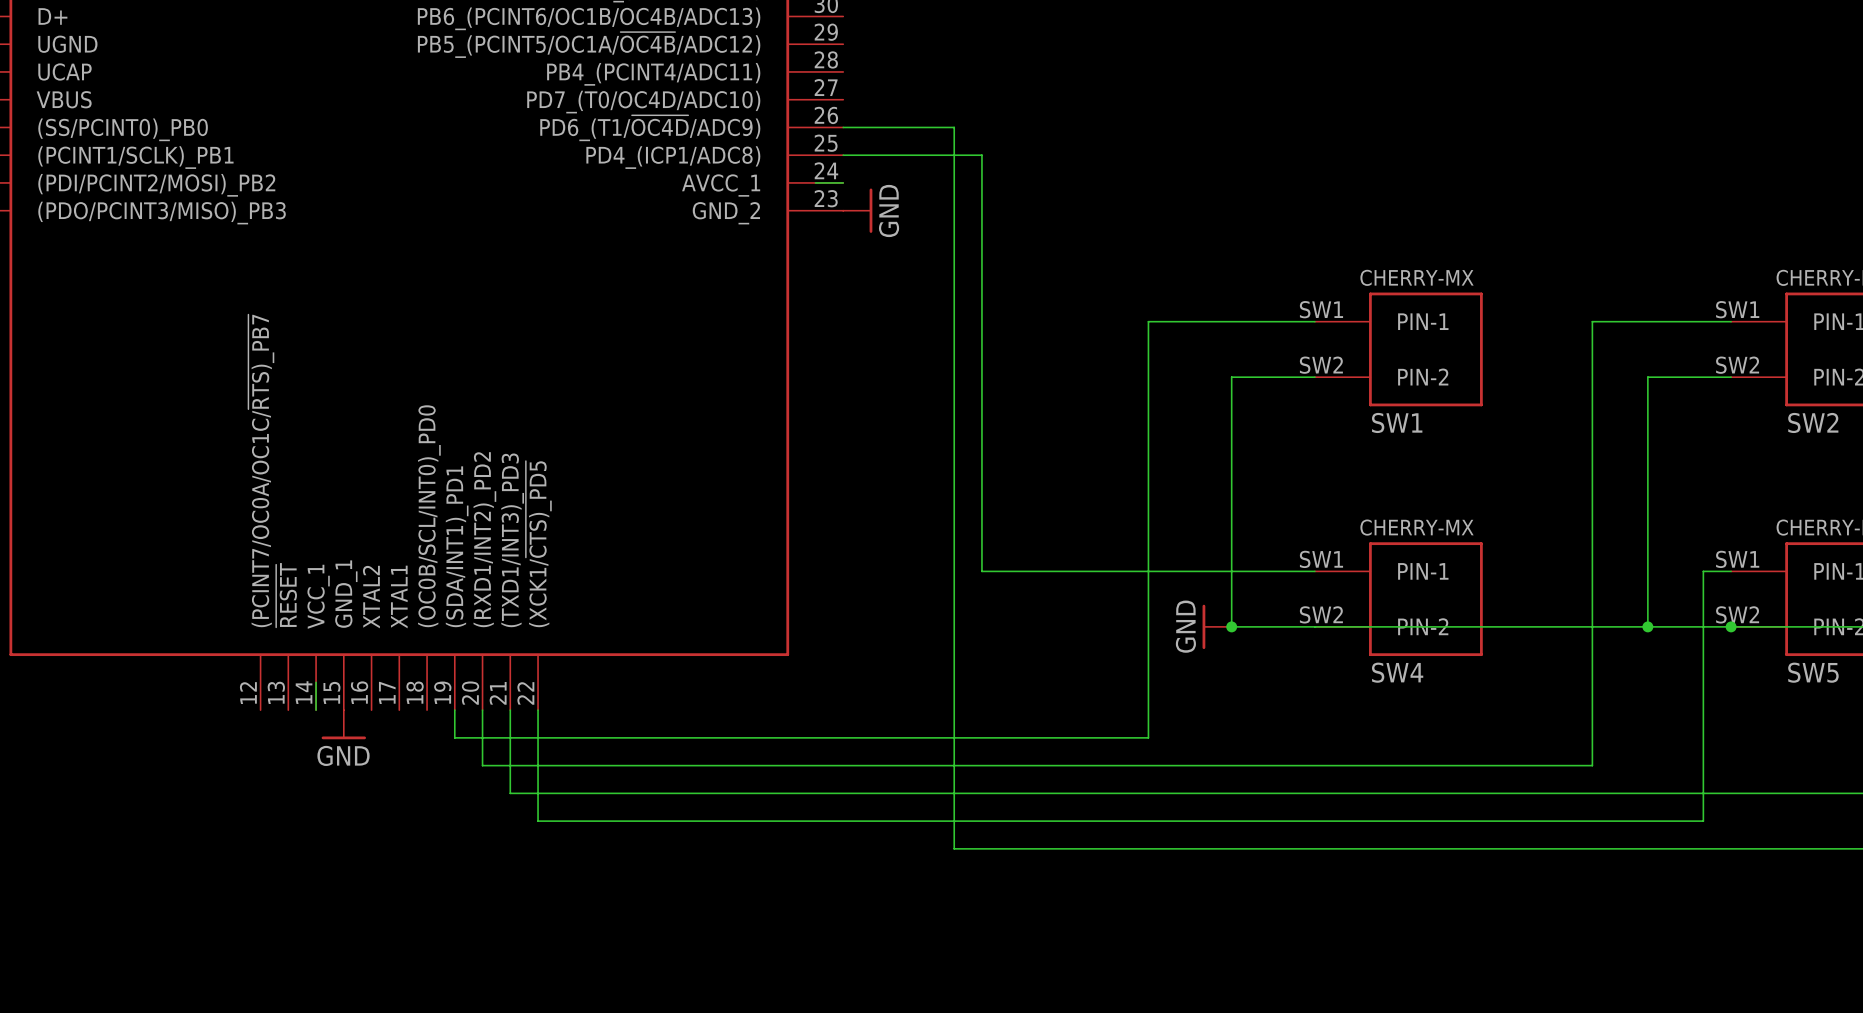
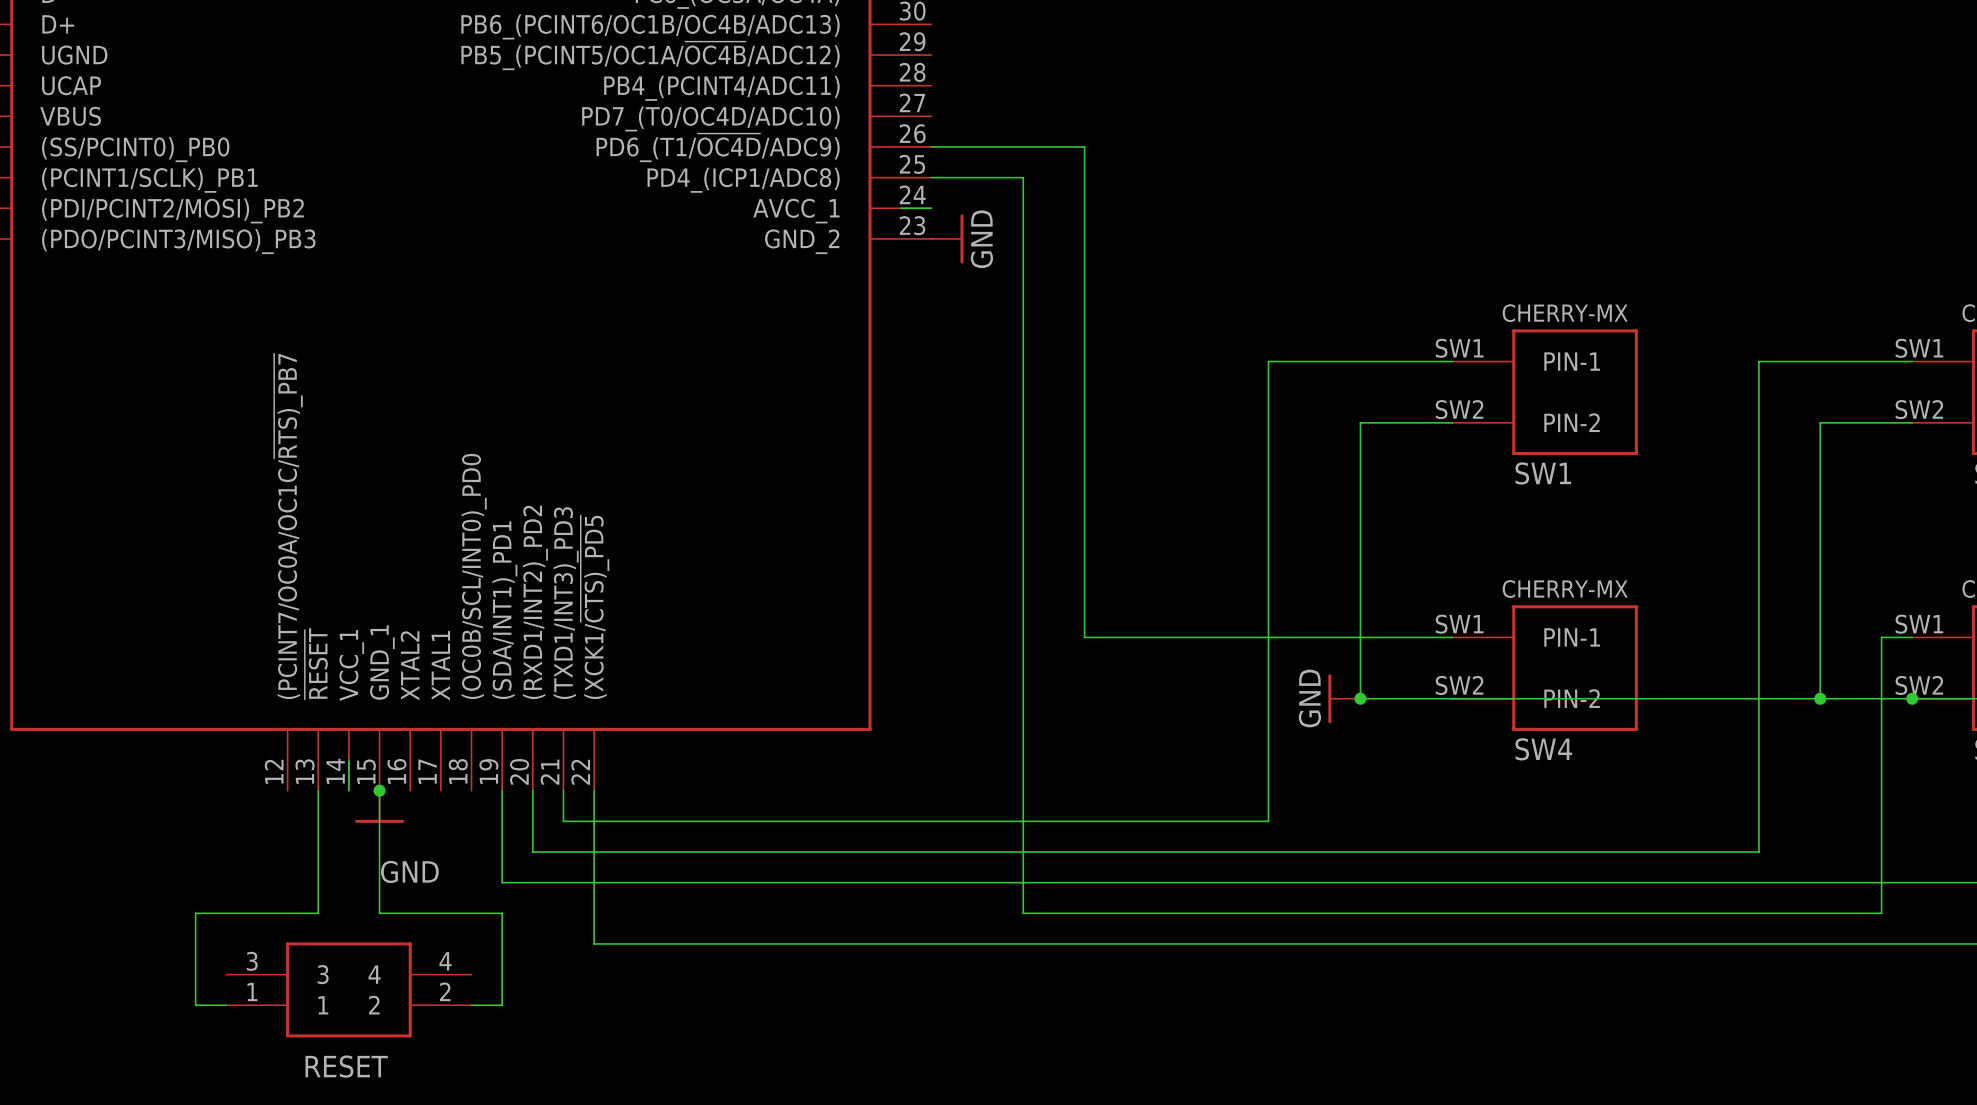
wire: (954, 127) (954, 848) -> none
wire: (926, 155) (981, 155) -> (1053, 146) (1084, 146) (1084, 177)
wire: none -> (1023, 177) (1023, 913)
wire: none -> (318, 790) (318, 913) (195, 913) (195, 1005) (226, 1005)
wire: none -> (379, 790) (379, 913) (502, 913) (502, 1005) (471, 1005)
junction: none -> (379, 790)
wire: (454, 737) (510, 737) (510, 793) -> (502, 821) (502, 882) (563, 882)
power symbol text position: GND (343, 755) -> GND (409, 871)
wire: (538, 821) (926, 821) -> (594, 913) (594, 943) (1053, 943)
RESET: none -> (348, 989)

